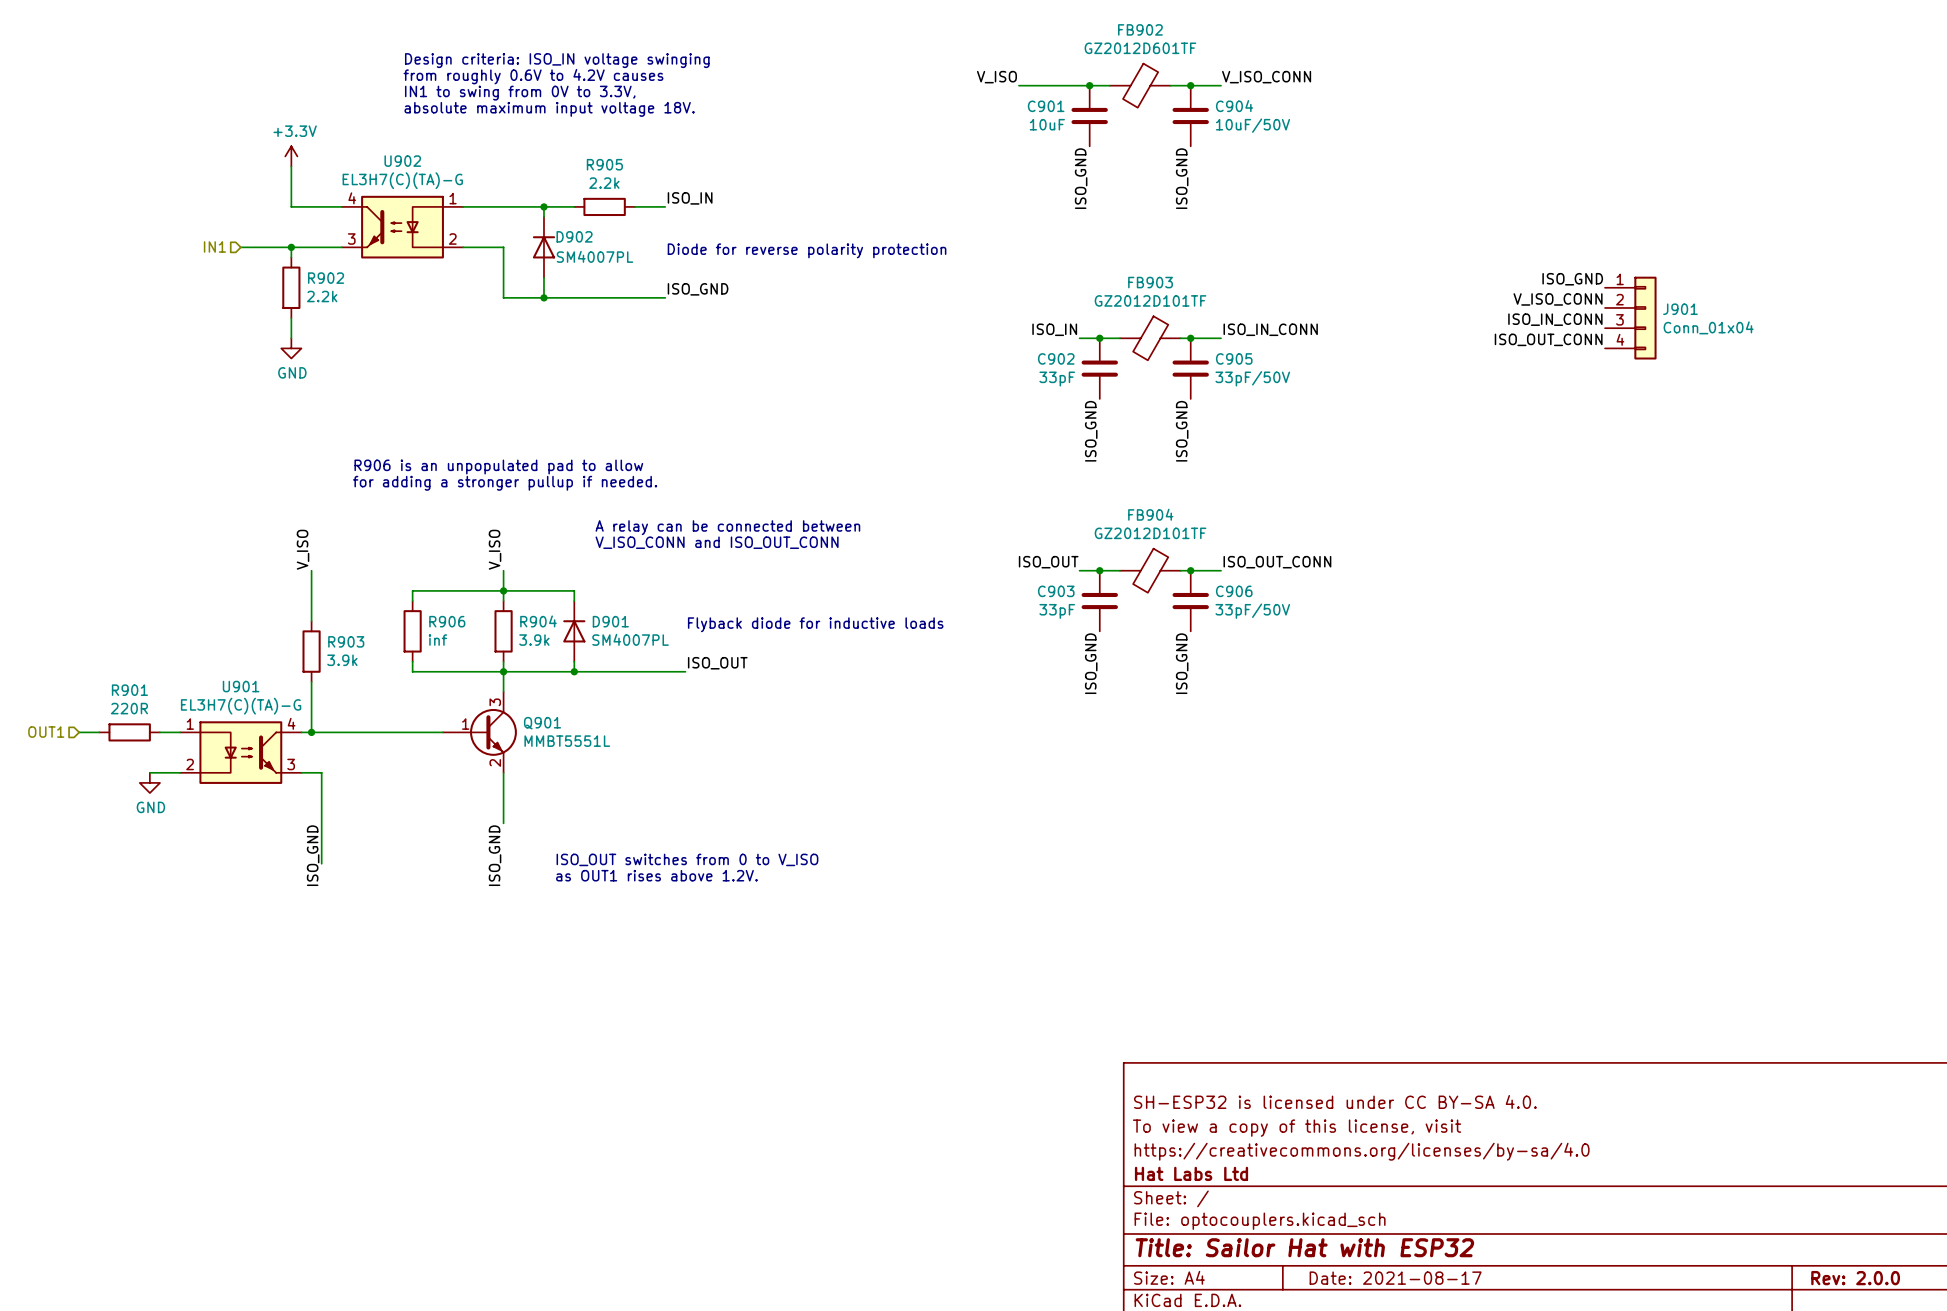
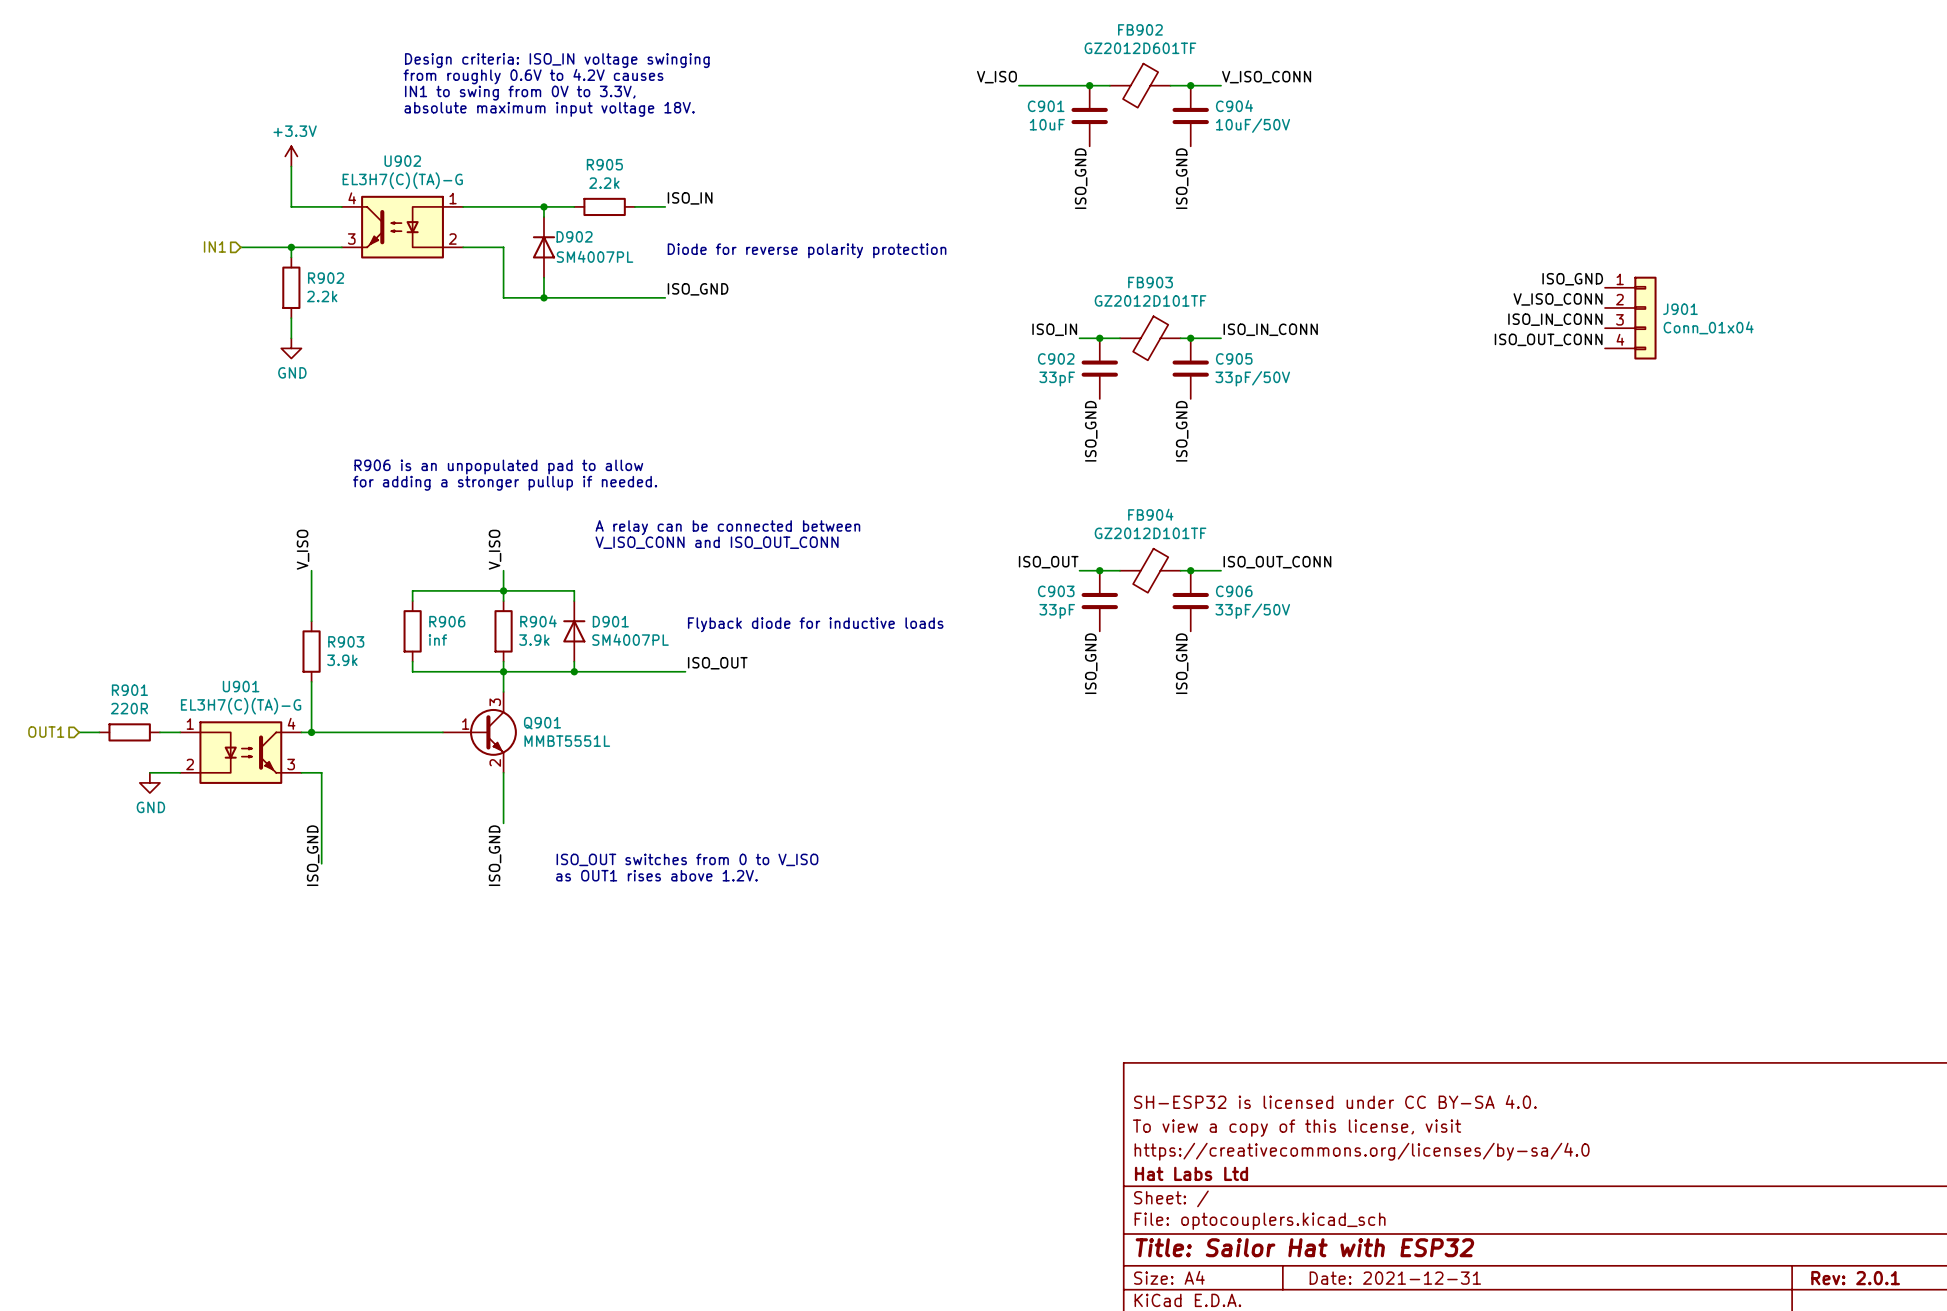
title block: Date: 2021-08-17 (1395, 1278) -> Date: 2021-12-31 (1395, 1278)
title block: Rev: 2.0.0 (1855, 1278) -> Rev: 2.0.1 (1855, 1278)

